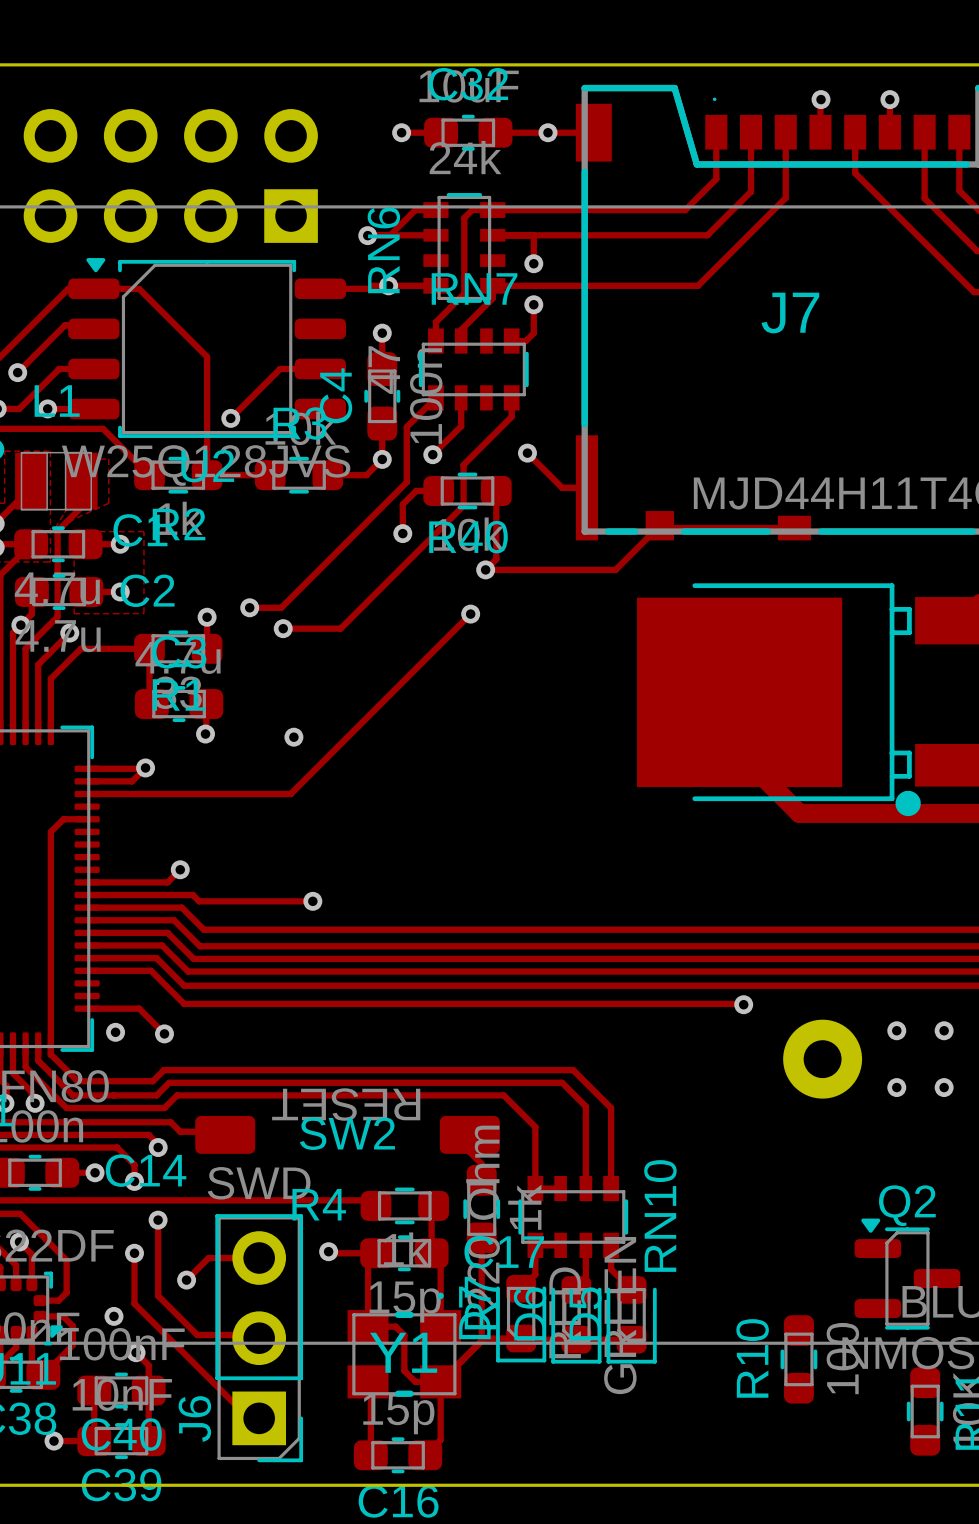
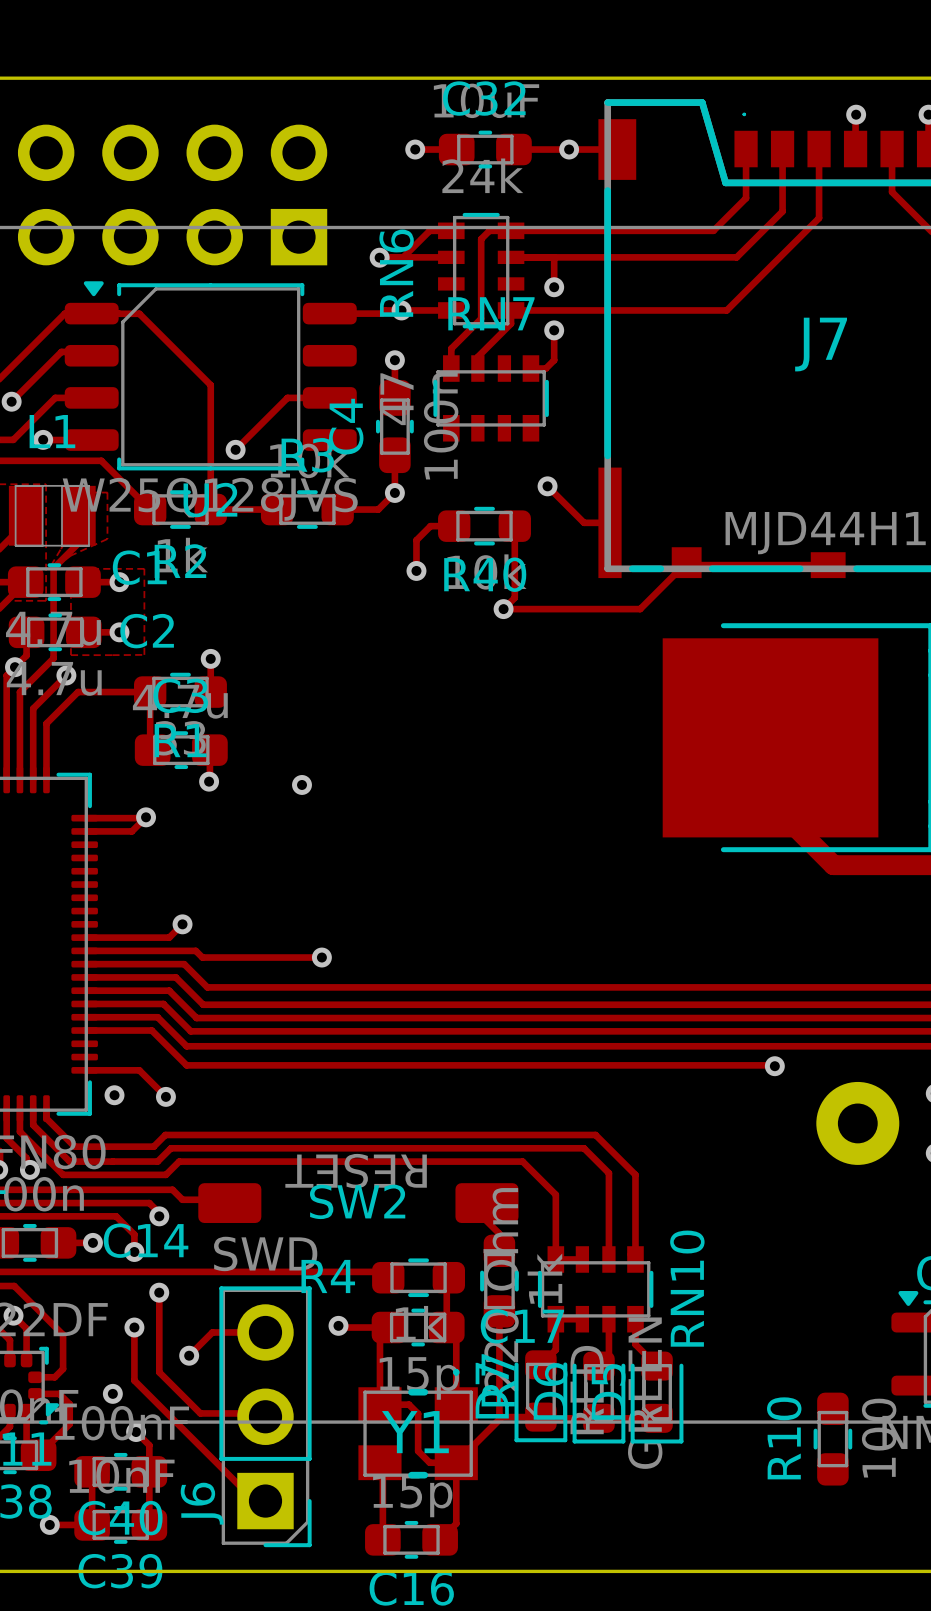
track: (435, 397) (406, 427) (406, 482) (281, 607) (249, 607) -> none
track: (461, 397) (461, 426) (432, 454) -> none
track: (511, 397) (511, 416) (463, 464) (463, 505) (340, 628) (283, 628) -> none
via: (432, 454) -> none
via: (249, 607) -> none
track: (470, 614) (290, 794) (87, 794) -> none
via: (470, 614) -> none
via: (283, 628) -> none
track: (87, 819) (63, 819) (50, 831) (50, 1044) -> none

